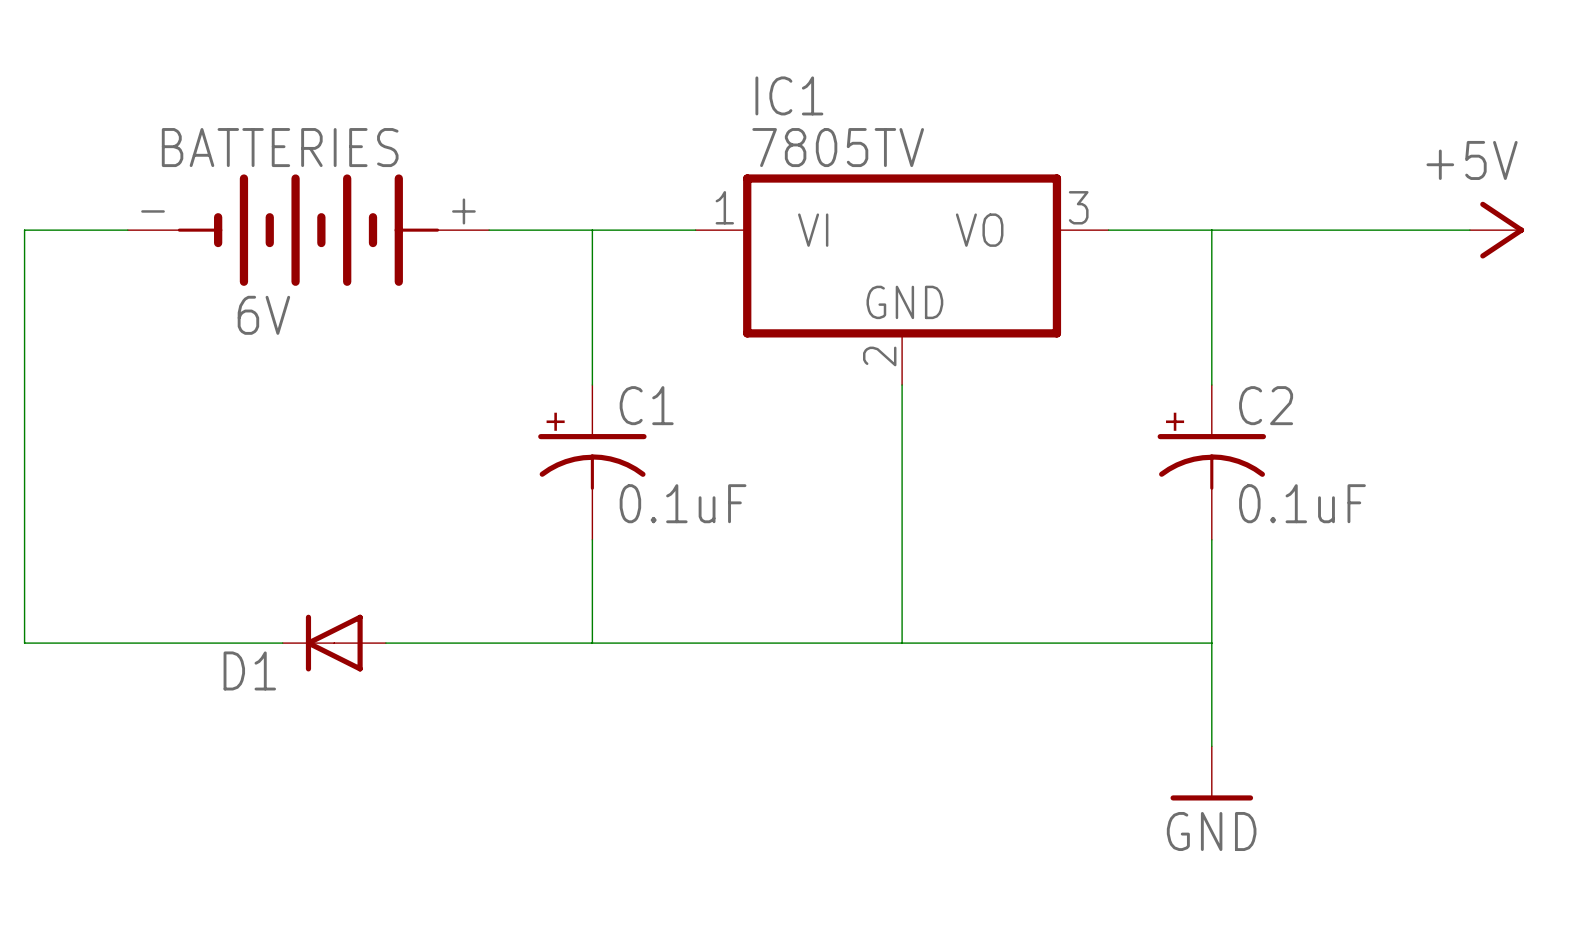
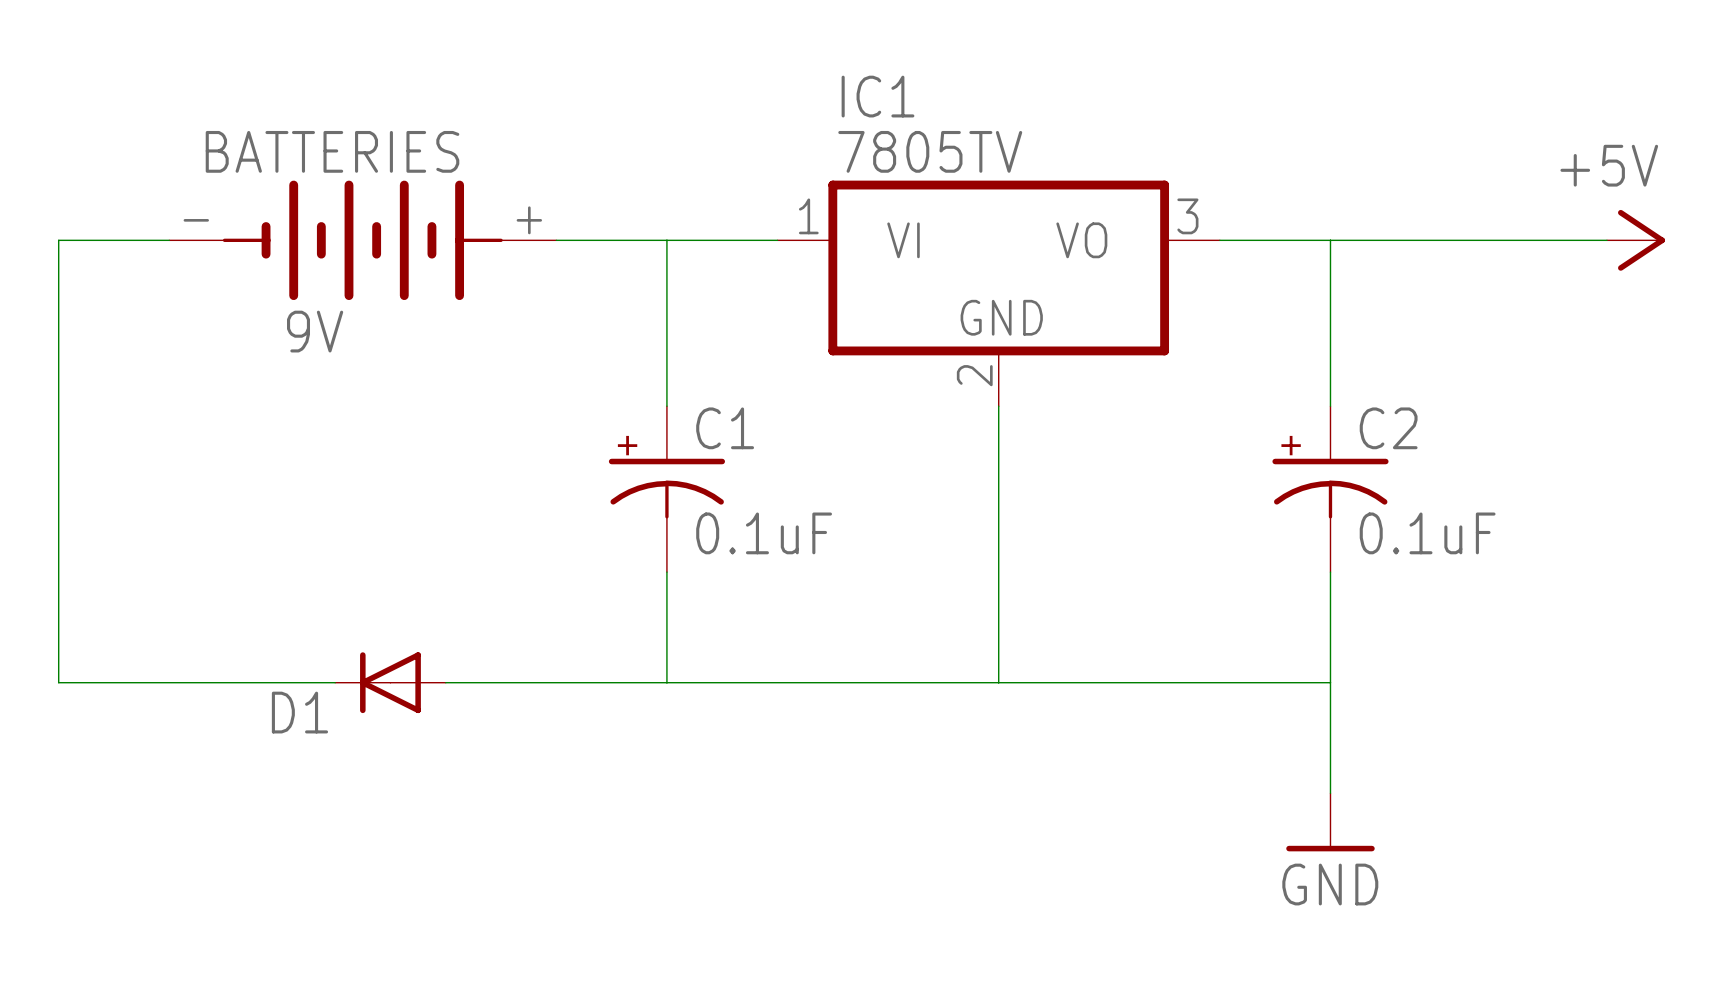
BATTERIES text: 6V (263, 315) -> 9V (315, 331)

